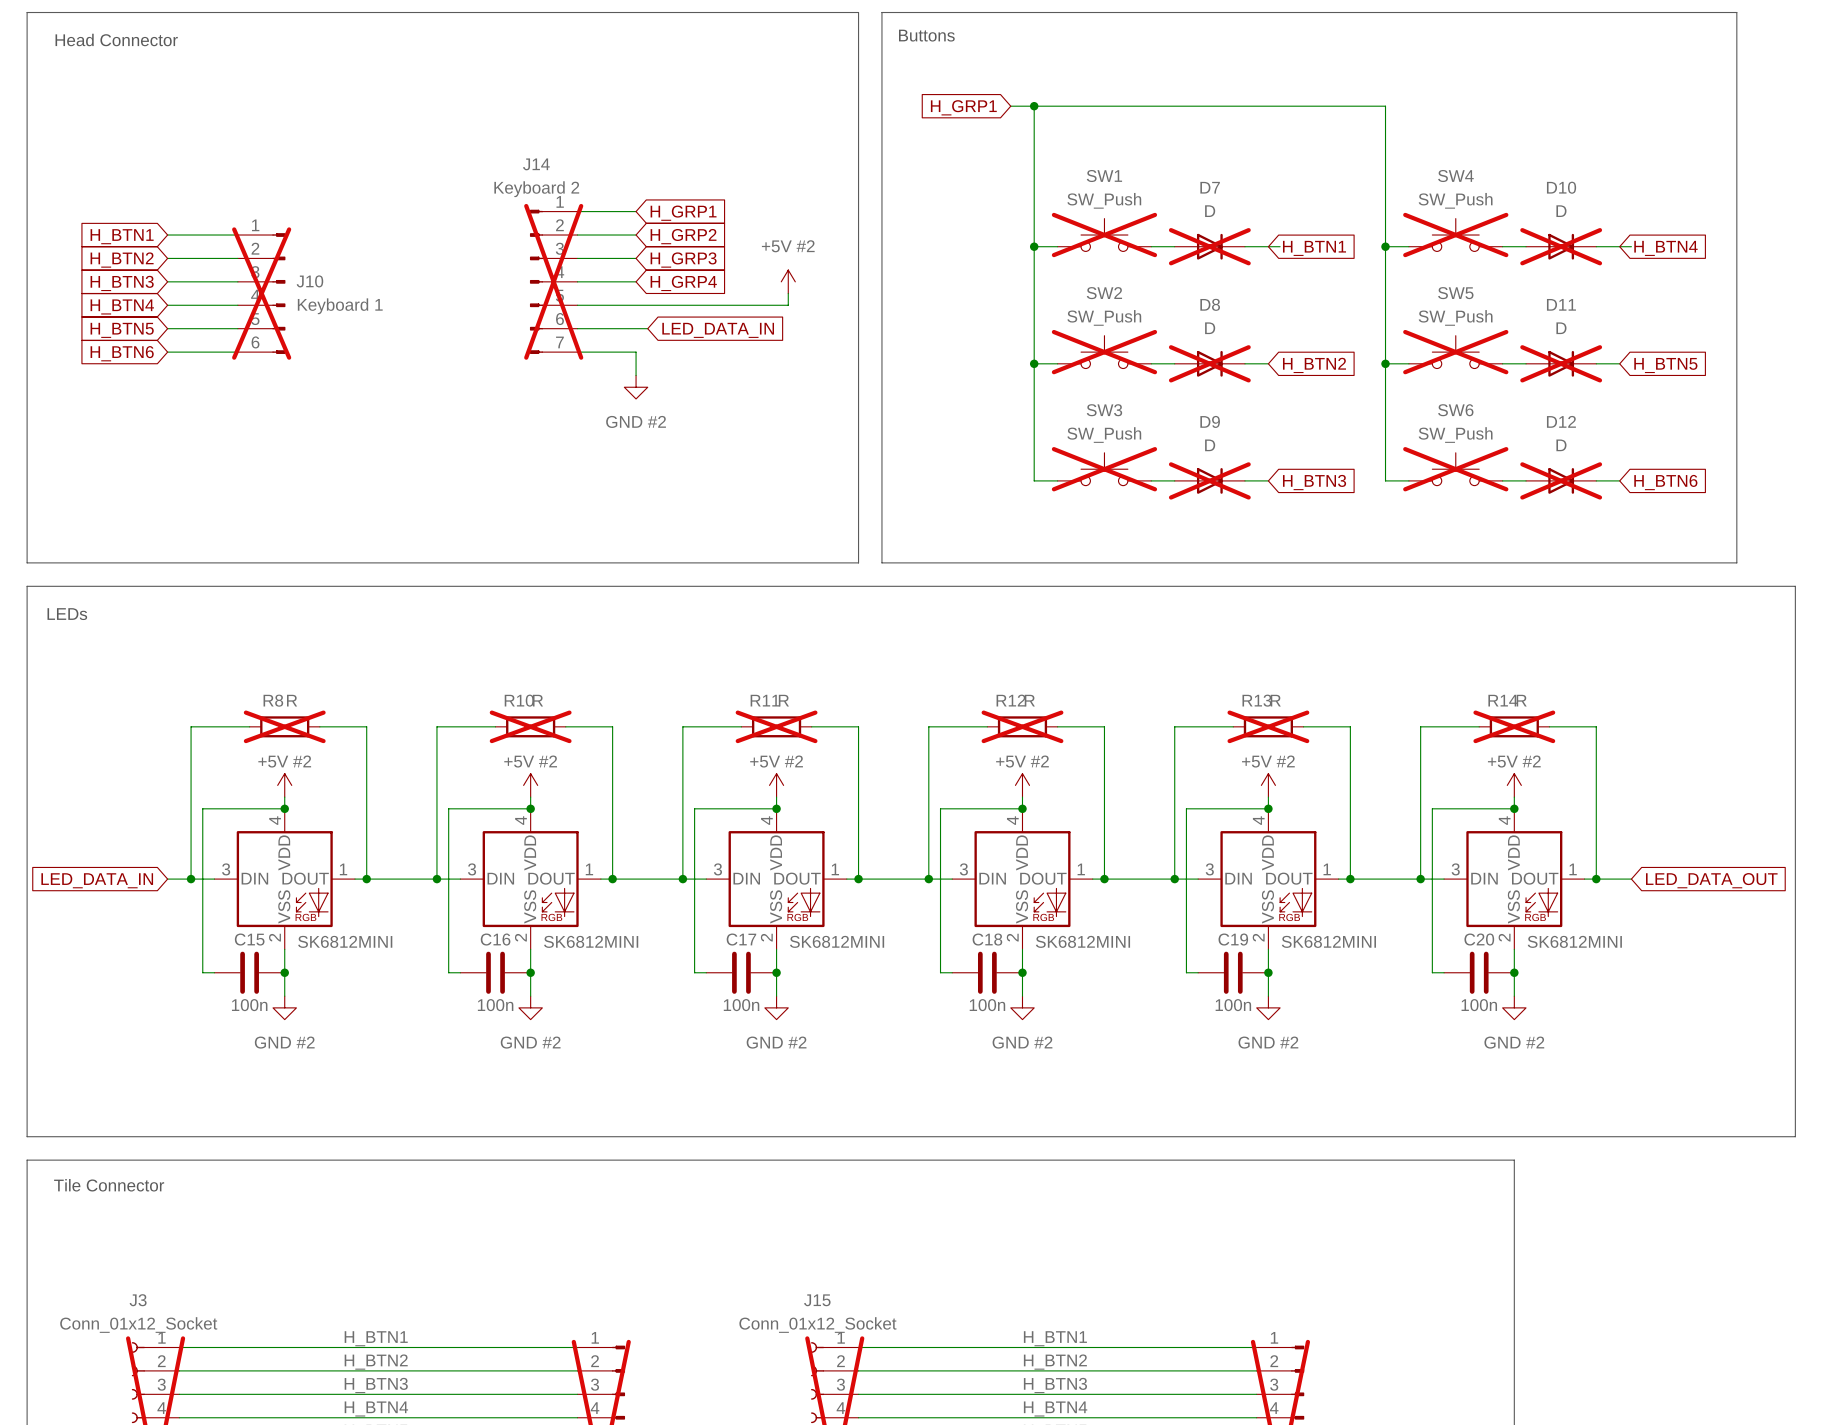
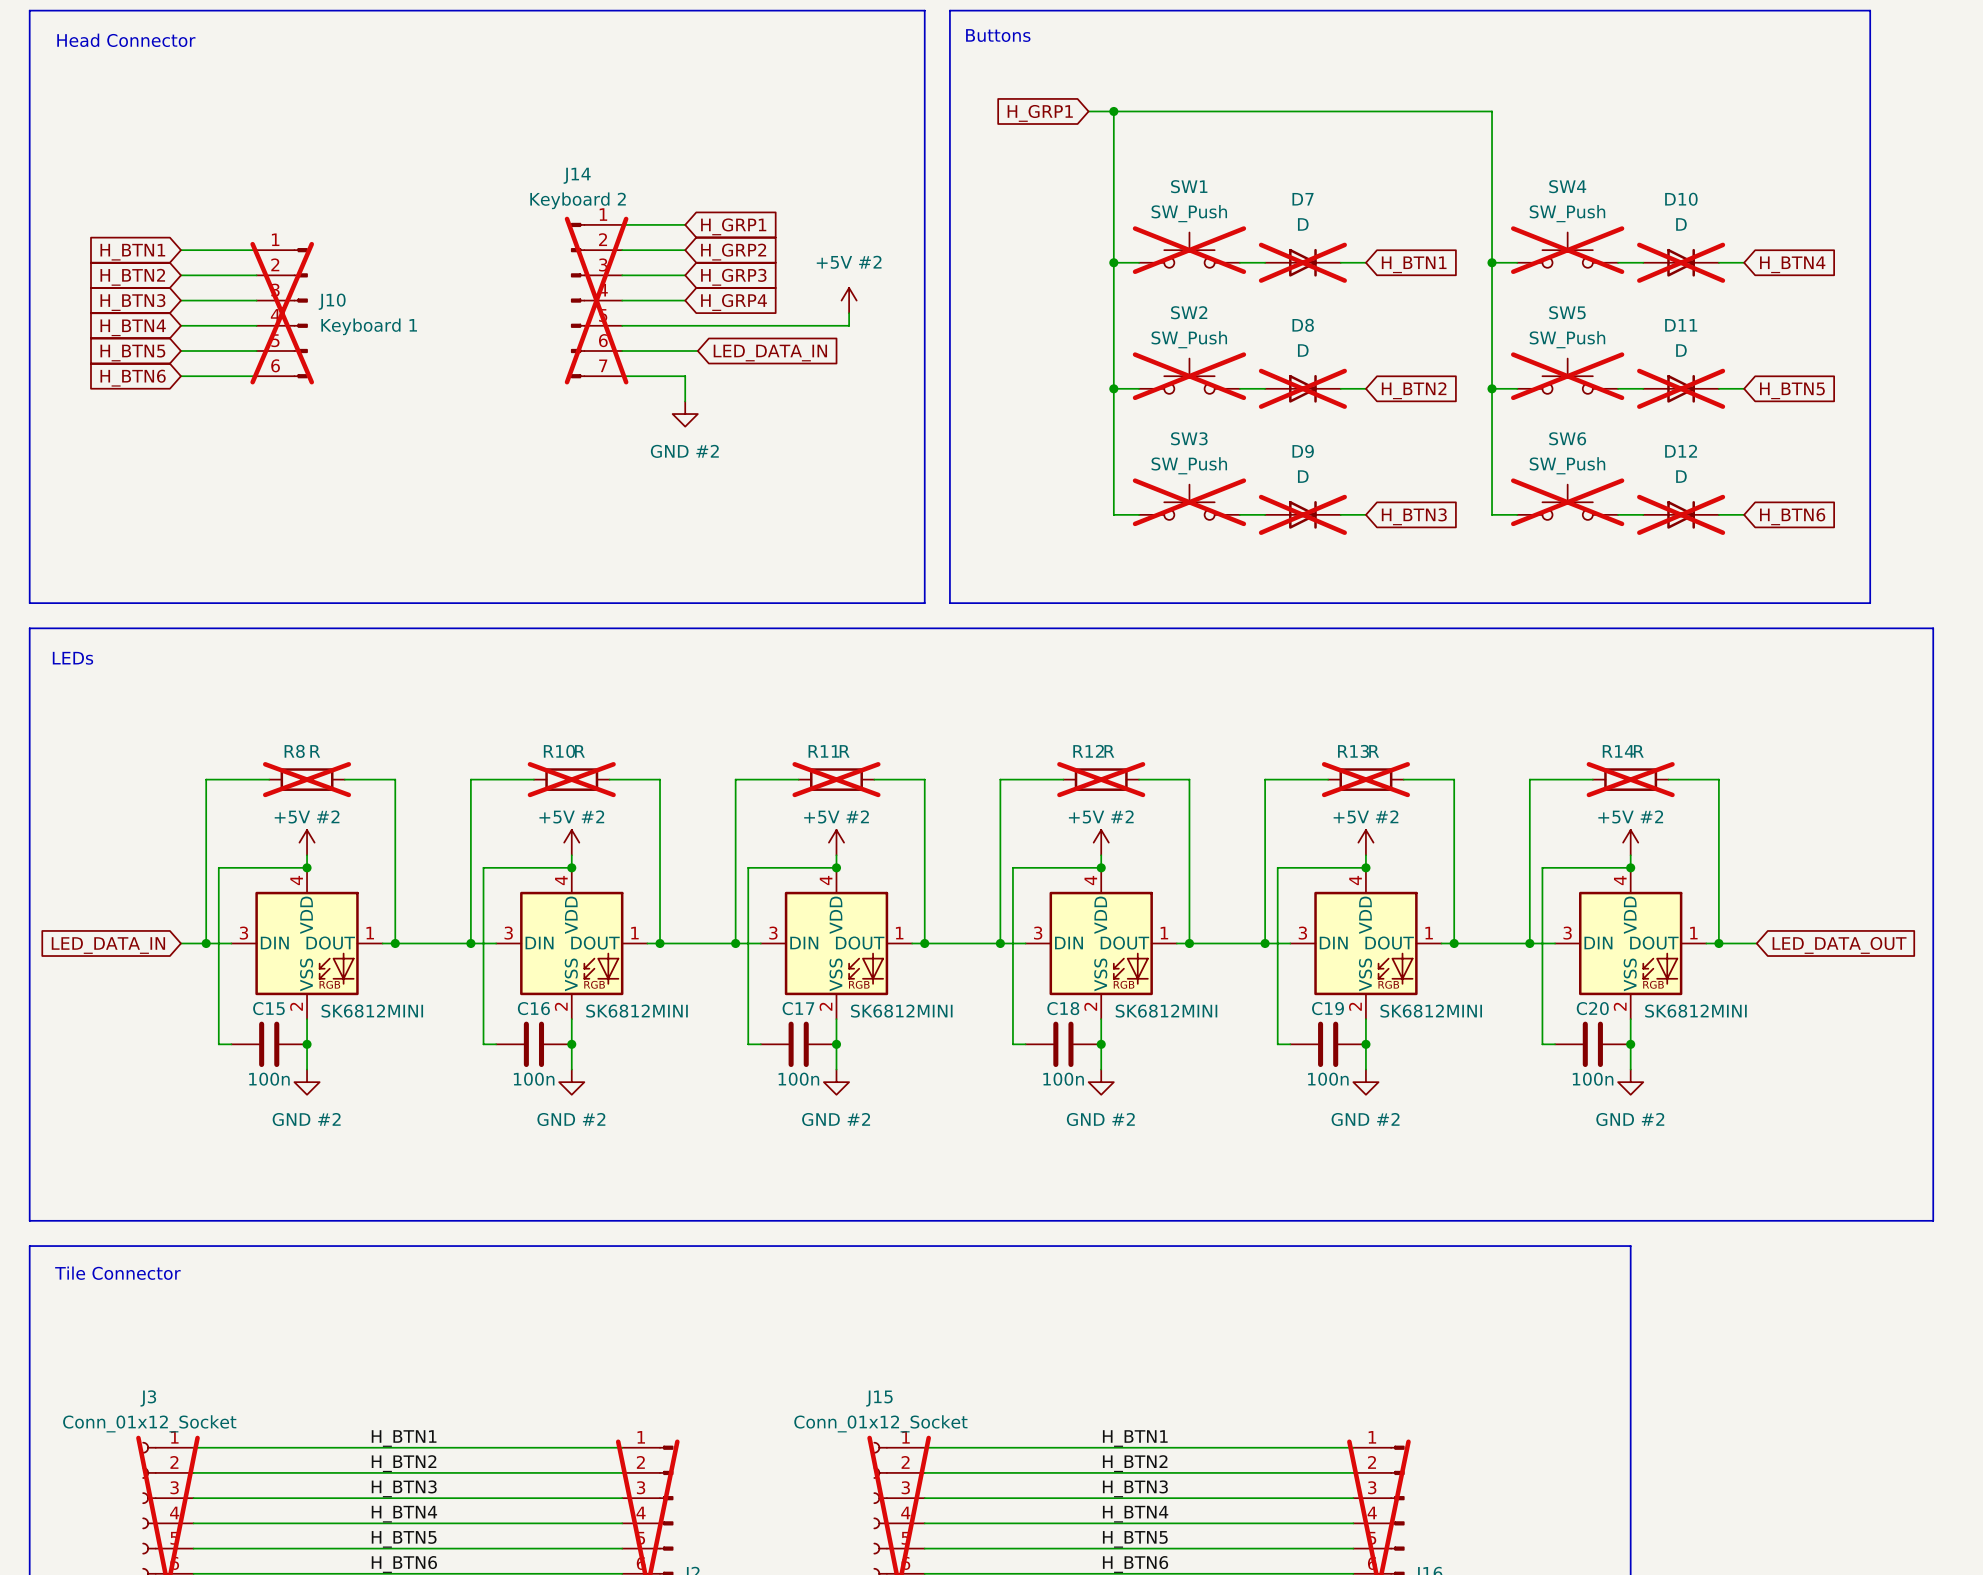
wire: (1268, 246) (1280, 246) -> none
wire: (1619, 246) (1631, 246) -> none

